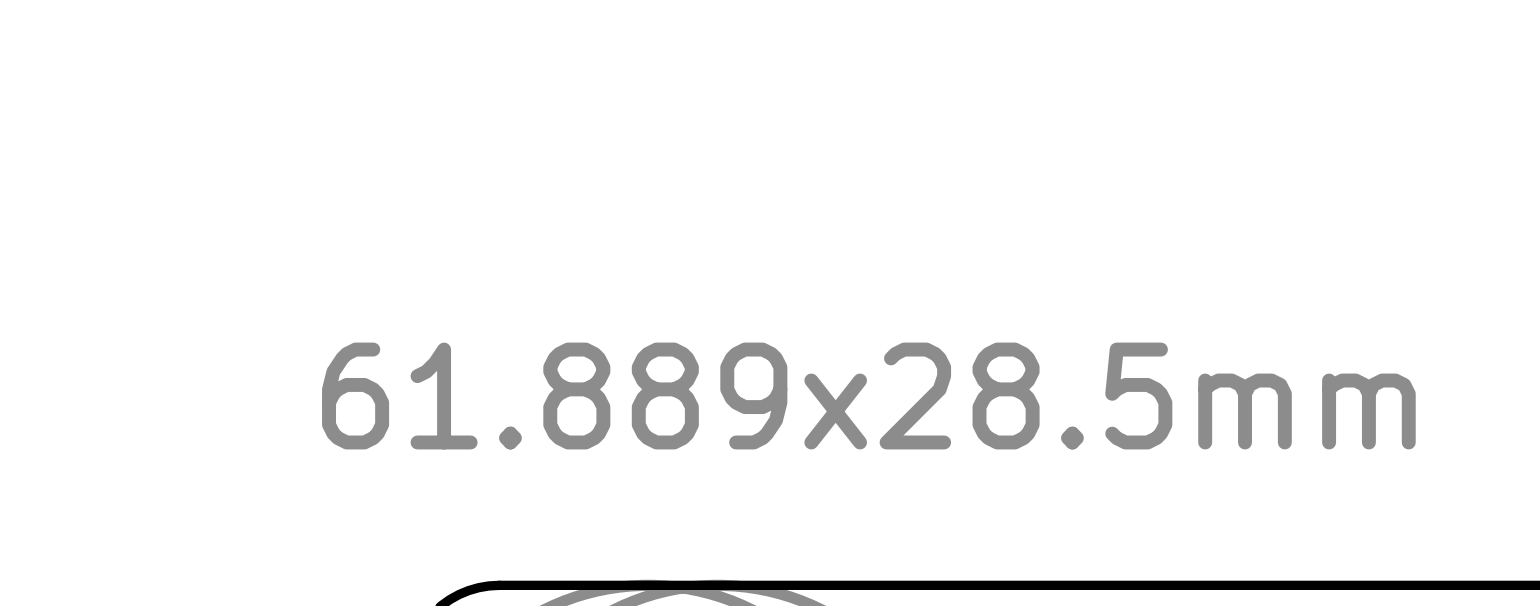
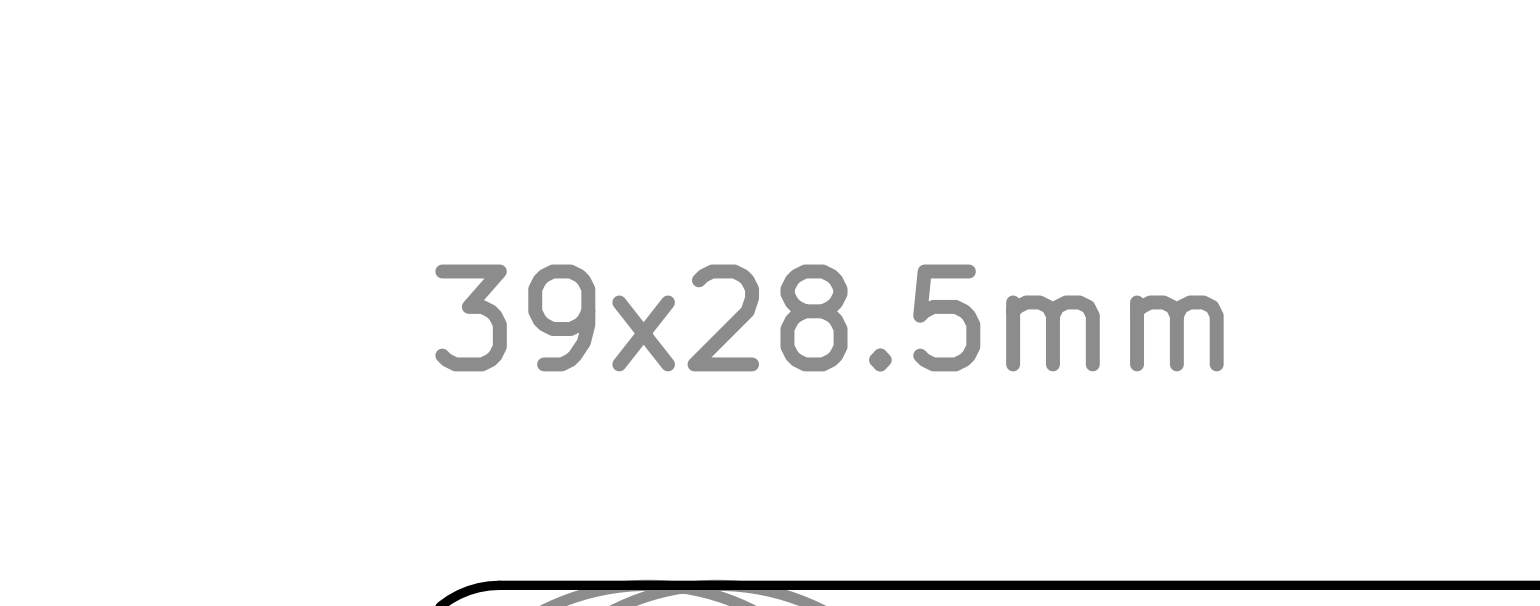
text: 61.889x28.5mm (868, 396) -> 39x28.5mm (829, 317)

